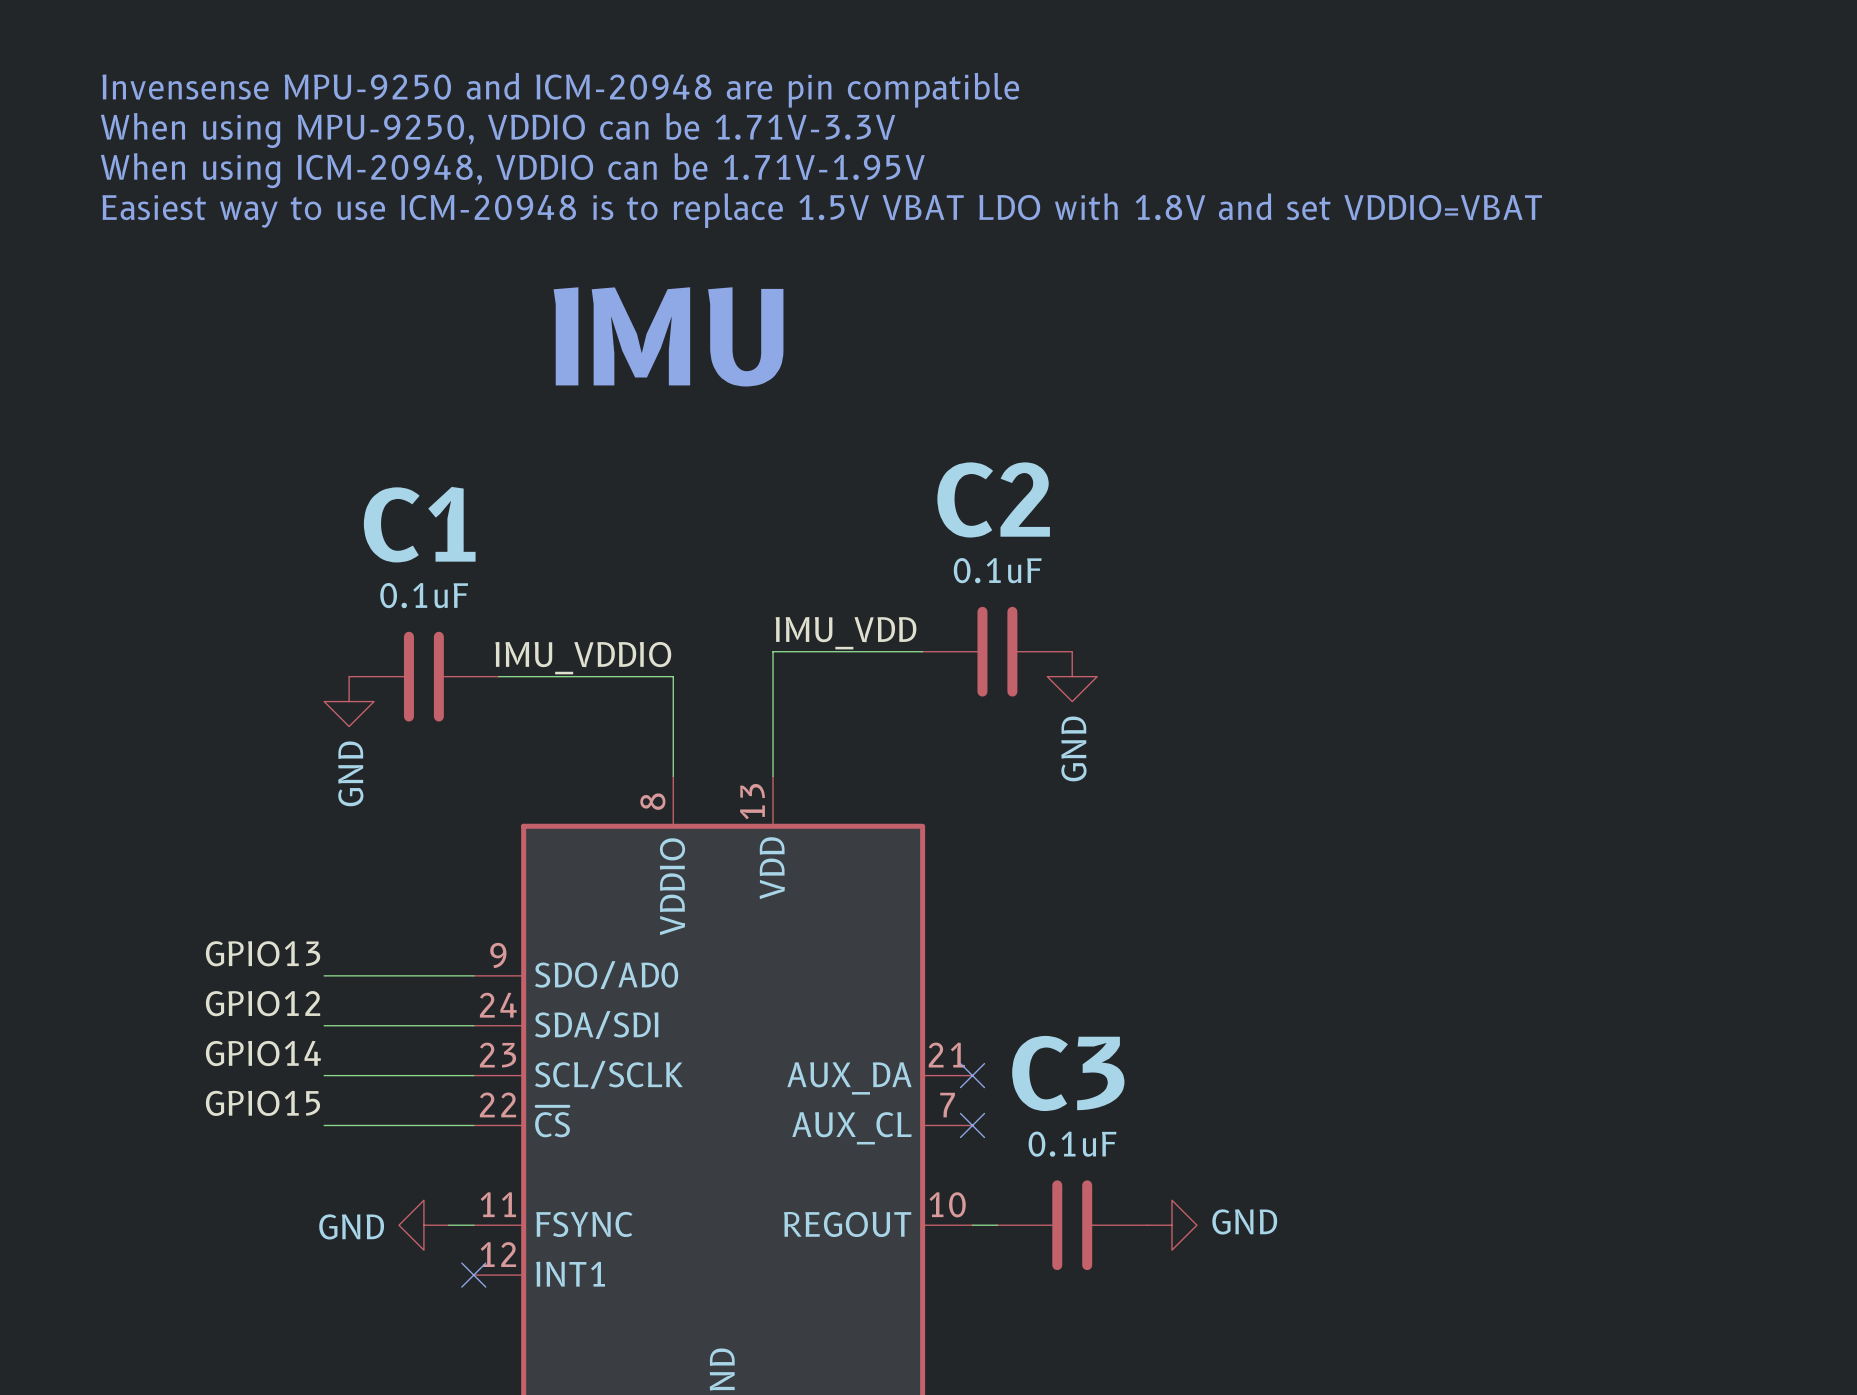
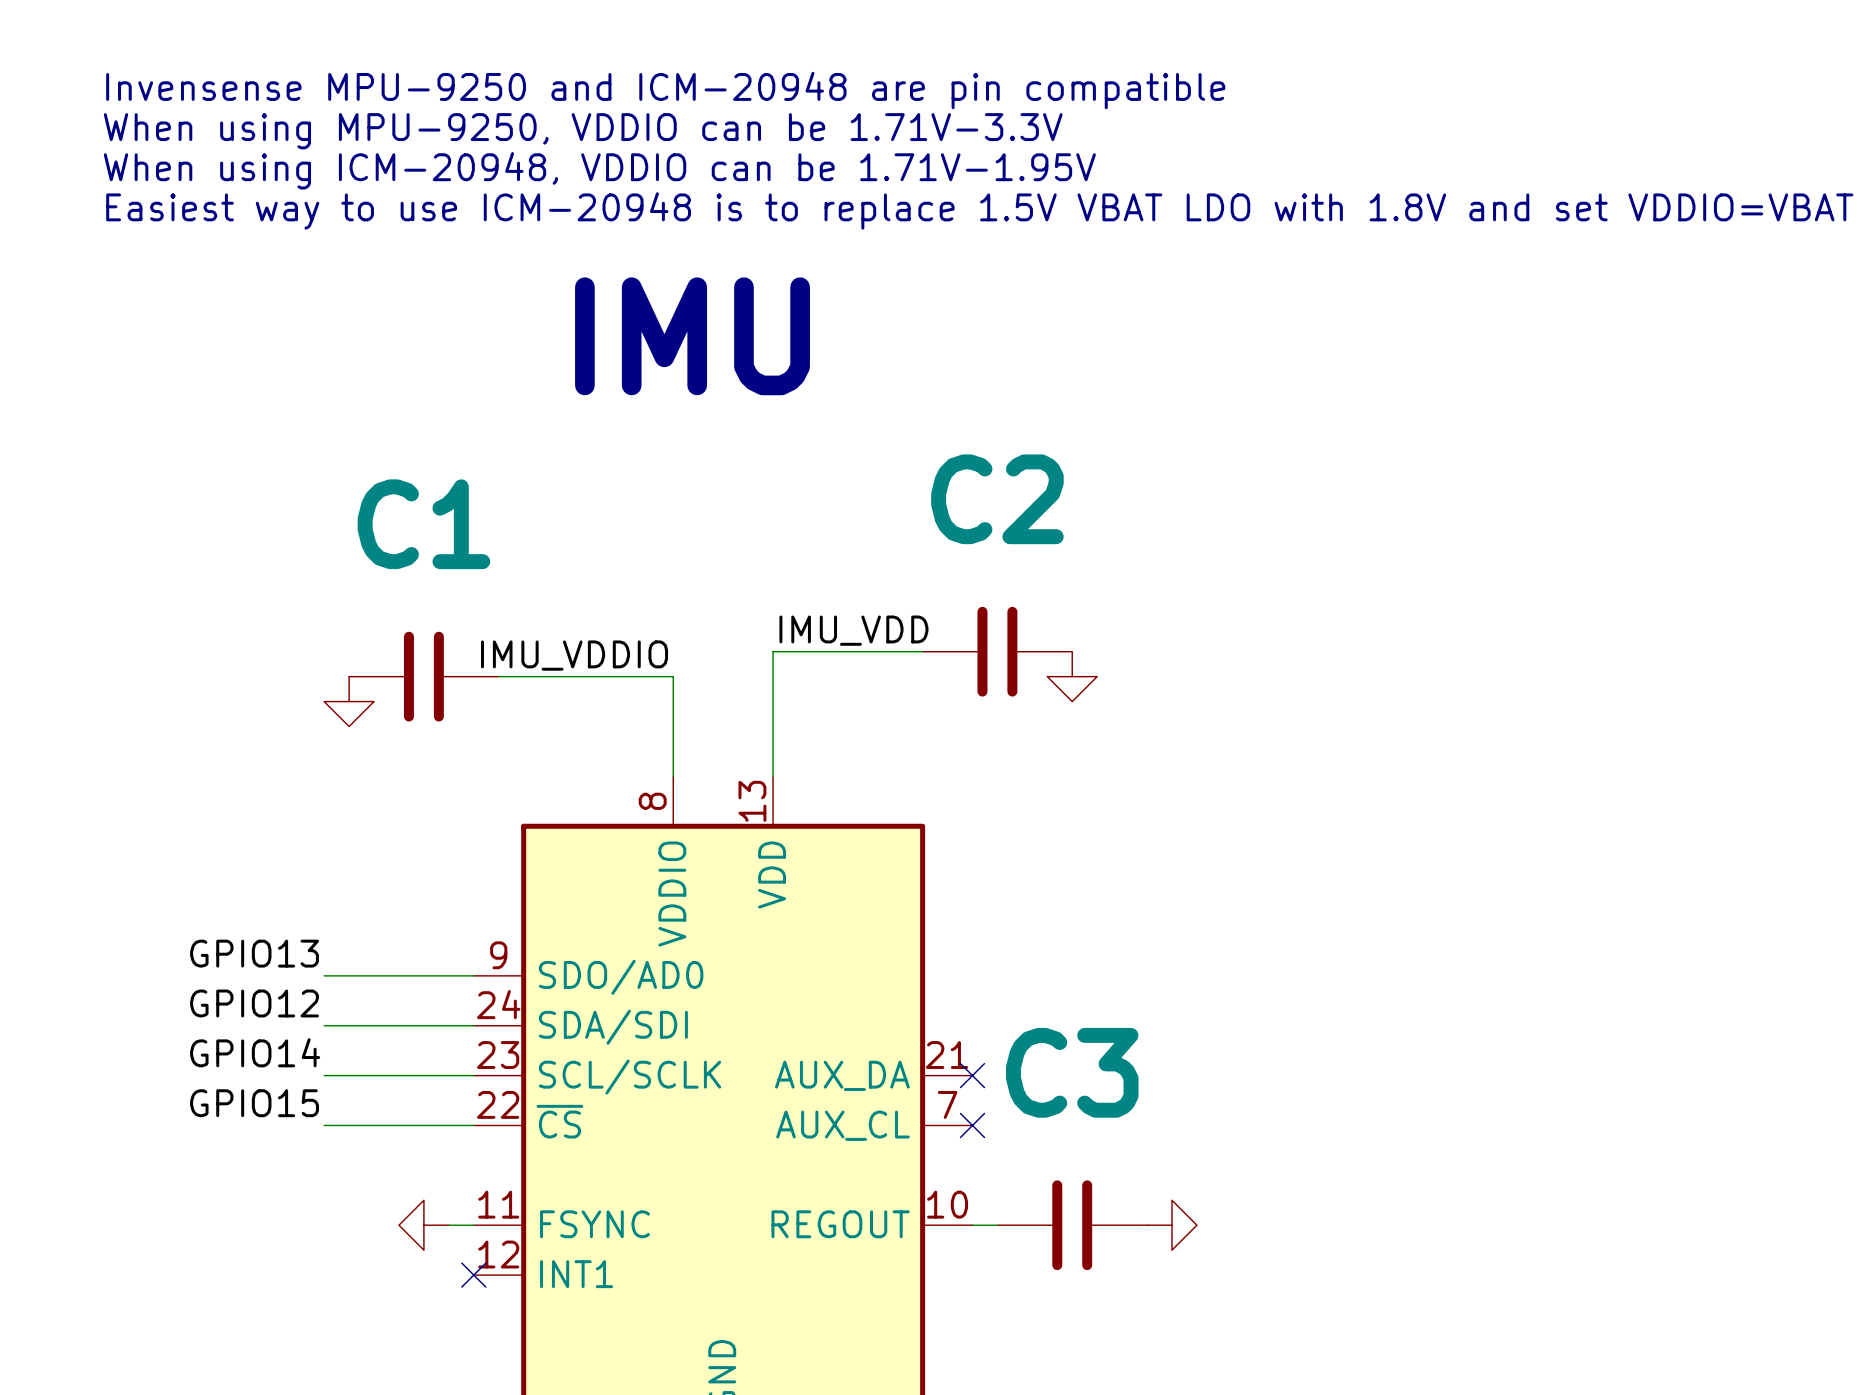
C2 value: 0.1uF (997, 570) -> none
C1 value: 0.1uF (424, 595) -> none
power symbol text: GND (1073, 748) -> none
power symbol text: GND (350, 773) -> none
C3 value: 0.1uF (1072, 1144) -> none
power symbol text: GND (1244, 1221) -> none
power symbol text: GND (351, 1226) -> none

